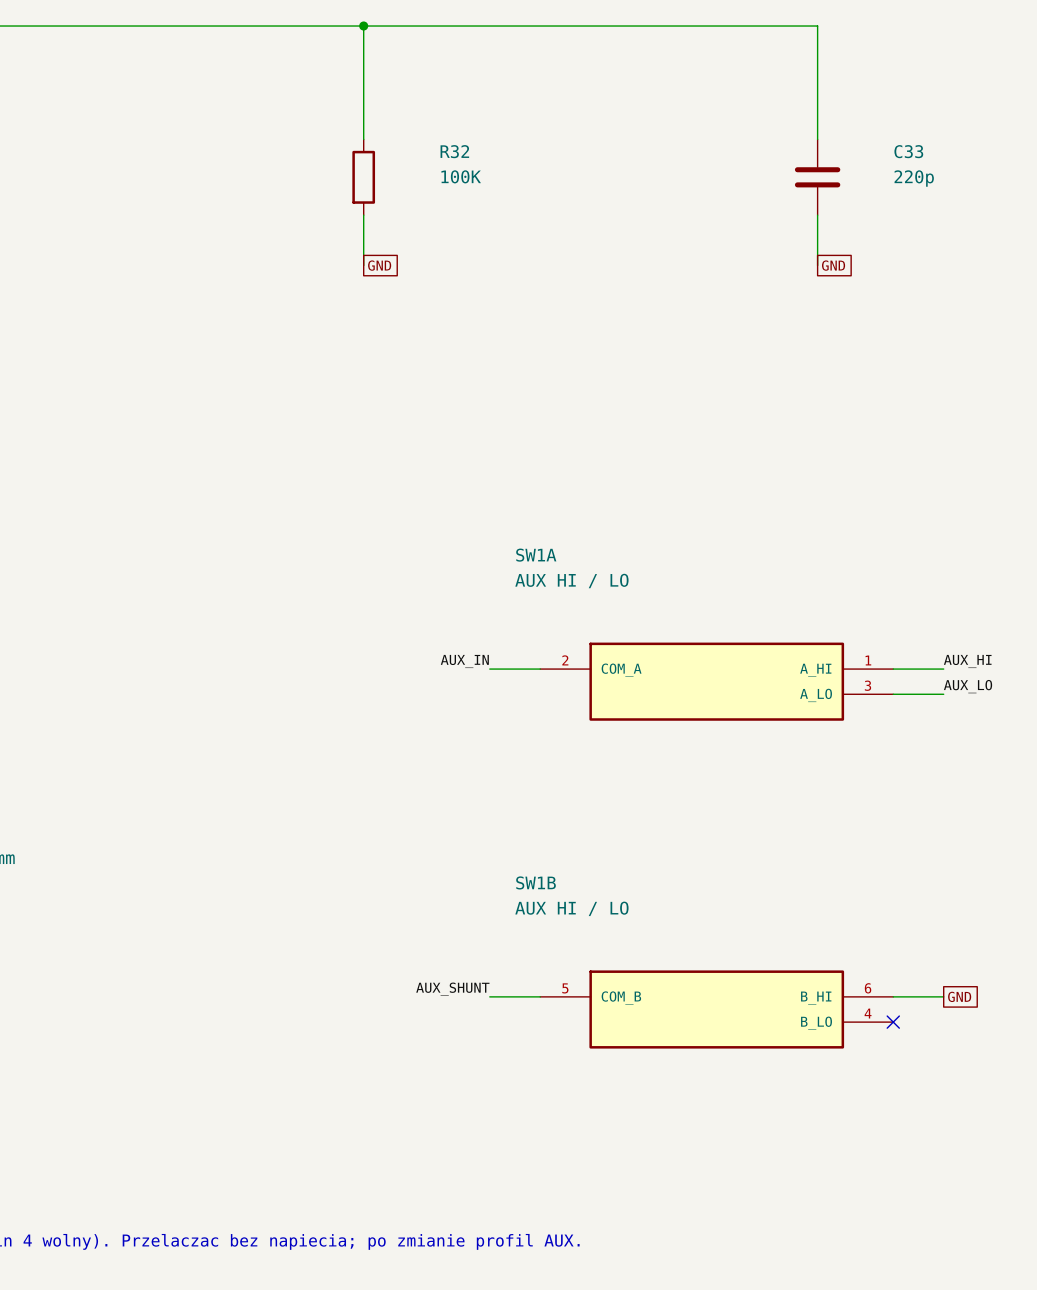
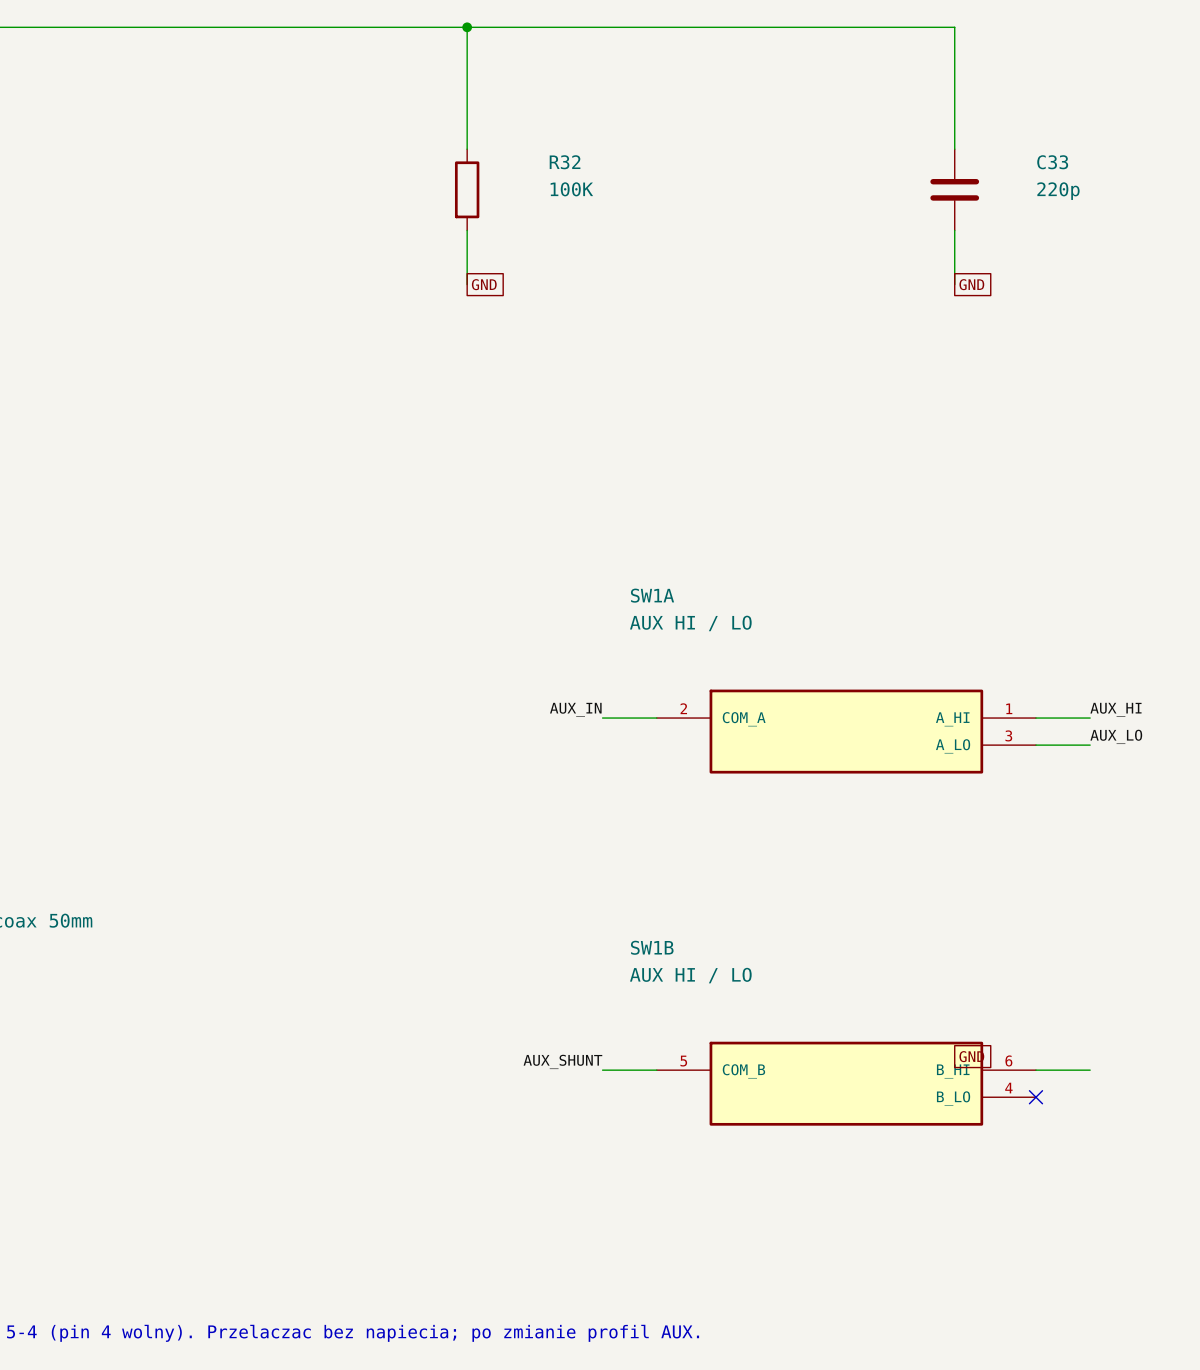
global label position: GND (959, 996) -> GND (971, 1056)

